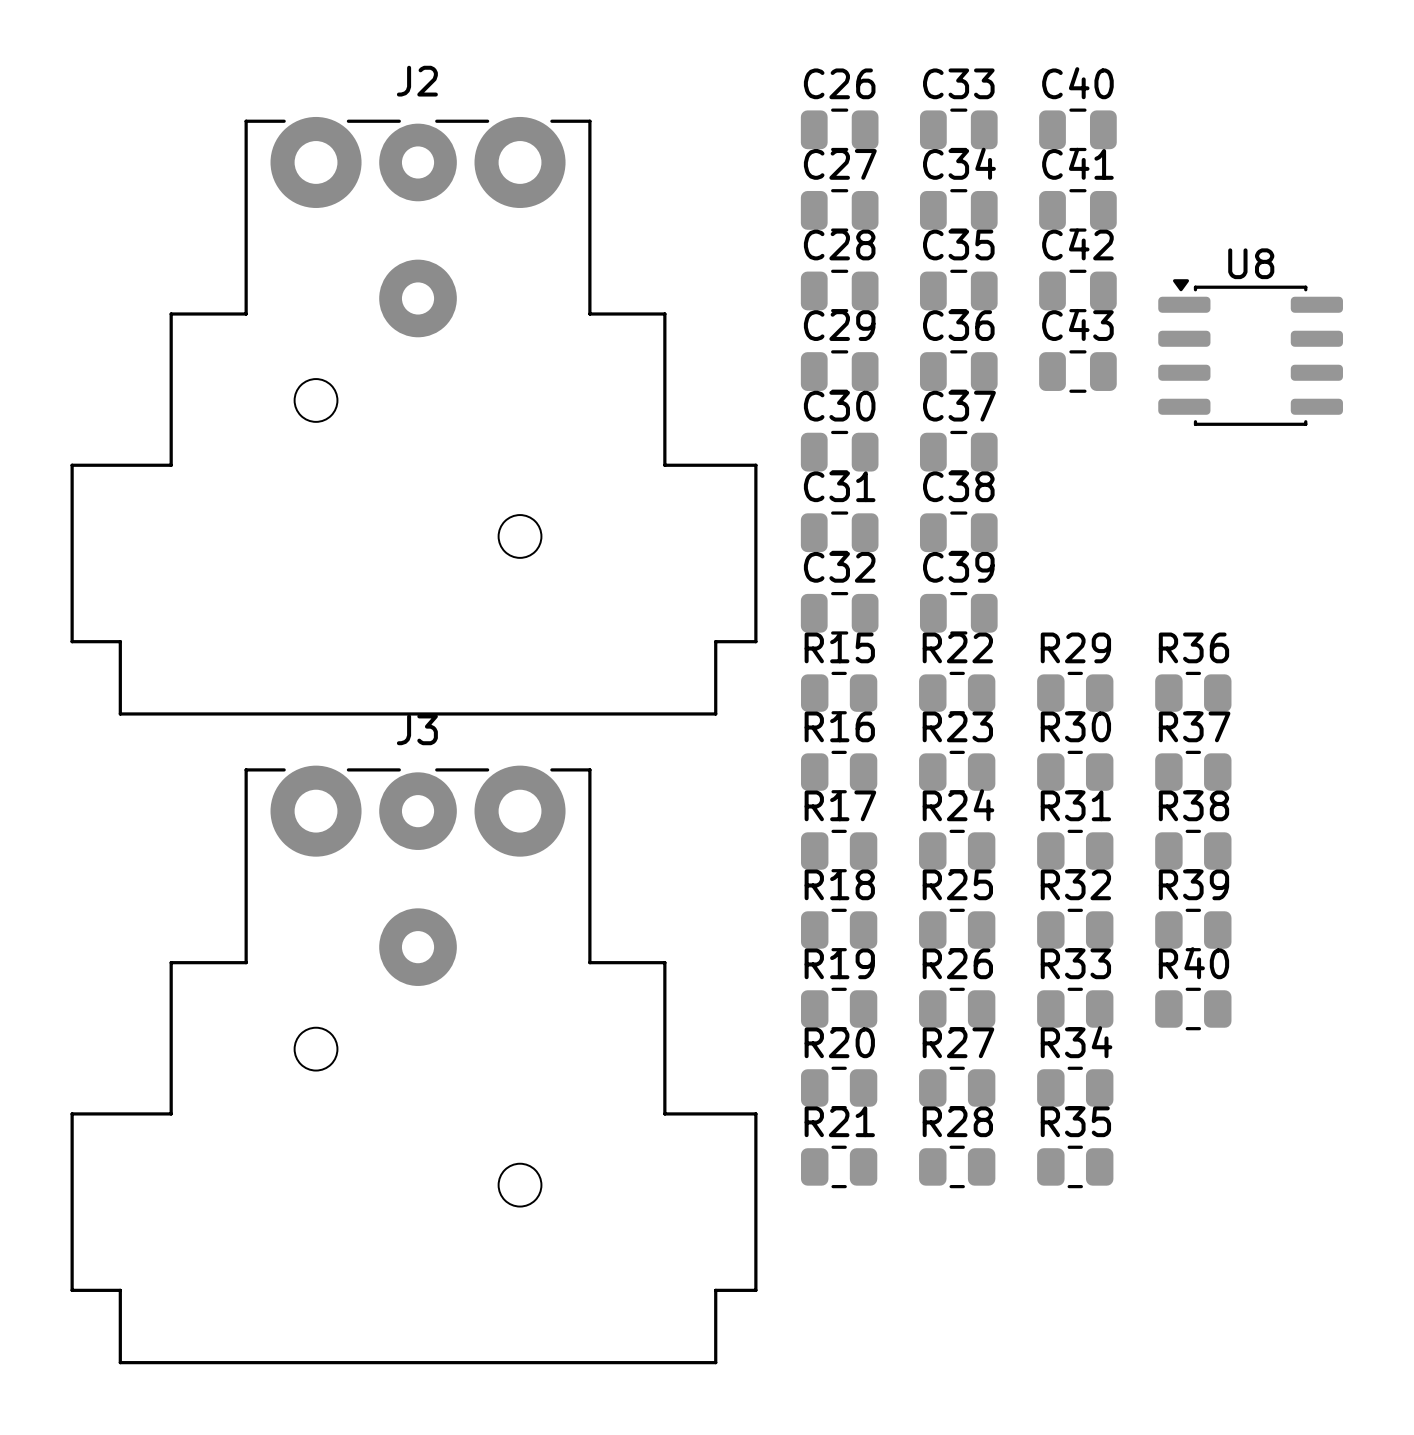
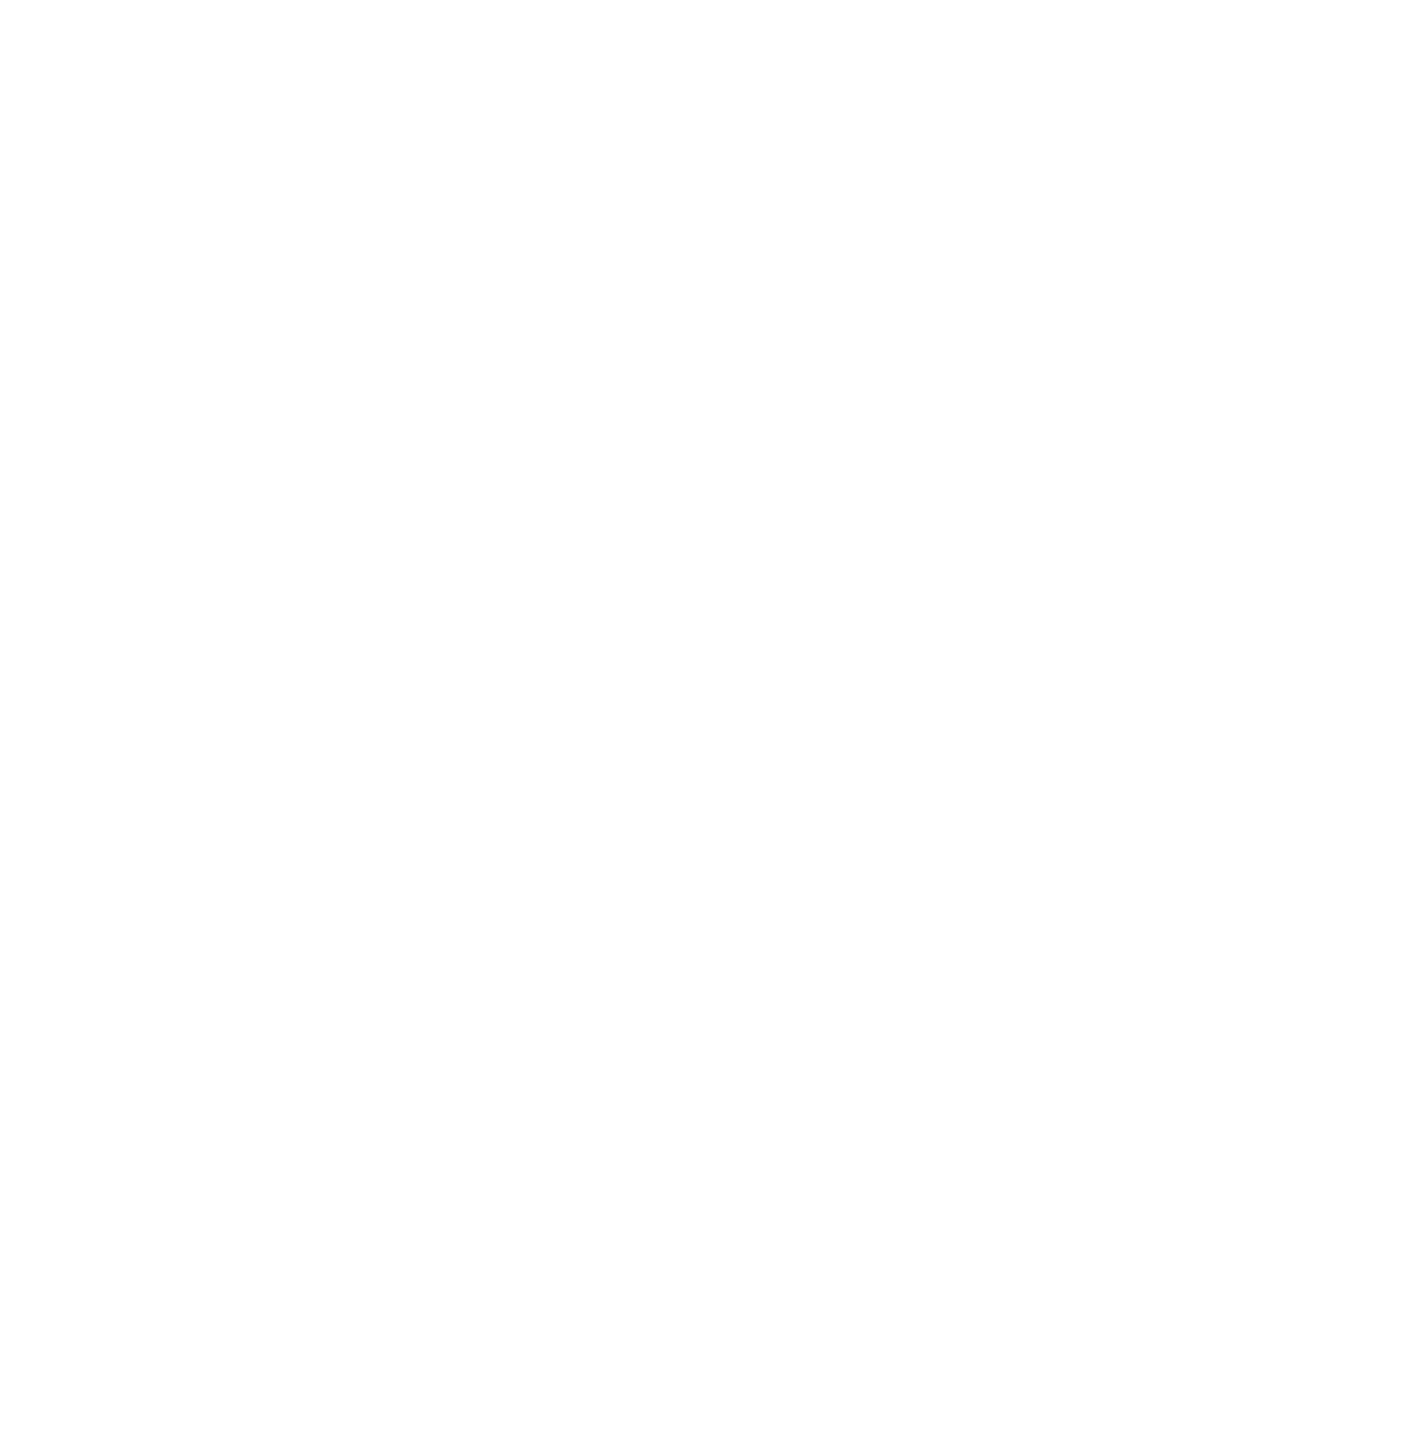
C26: (839, 129) -> none
C33: (958, 129) -> none
C40: (1077, 129) -> none
C27: (839, 210) -> none
C34: (958, 210) -> none
C41: (1077, 210) -> none
C28: (839, 290) -> none
C35: (958, 290) -> none
C42: (1077, 290) -> none
U8: (1250, 352) -> none
C29: (839, 371) -> none
C36: (958, 371) -> none
C43: (1077, 371) -> none
J2: (414, 416) -> none
C30: (839, 452) -> none
C37: (958, 452) -> none
C31: (839, 532) -> none
C38: (958, 532) -> none
C32: (839, 613) -> none
C39: (958, 613) -> none
R15: (839, 693) -> none
R22: (957, 693) -> none
R29: (1075, 693) -> none
R36: (1193, 693) -> none
R16: (839, 772) -> none
R23: (957, 772) -> none
R30: (1075, 772) -> none
R37: (1193, 772) -> none
R17: (839, 851) -> none
R24: (957, 851) -> none
R31: (1075, 851) -> none
R38: (1193, 851) -> none
R18: (839, 930) -> none
R25: (957, 930) -> none
R32: (1075, 930) -> none
R39: (1193, 930) -> none
R19: (839, 1008) -> none
R26: (957, 1008) -> none
R33: (1075, 1008) -> none
R40: (1193, 1008) -> none
J3: (414, 1064) -> none
R20: (839, 1087) -> none
R27: (957, 1087) -> none
R34: (1075, 1087) -> none
R21: (839, 1166) -> none
R28: (957, 1166) -> none
R35: (1075, 1166) -> none

